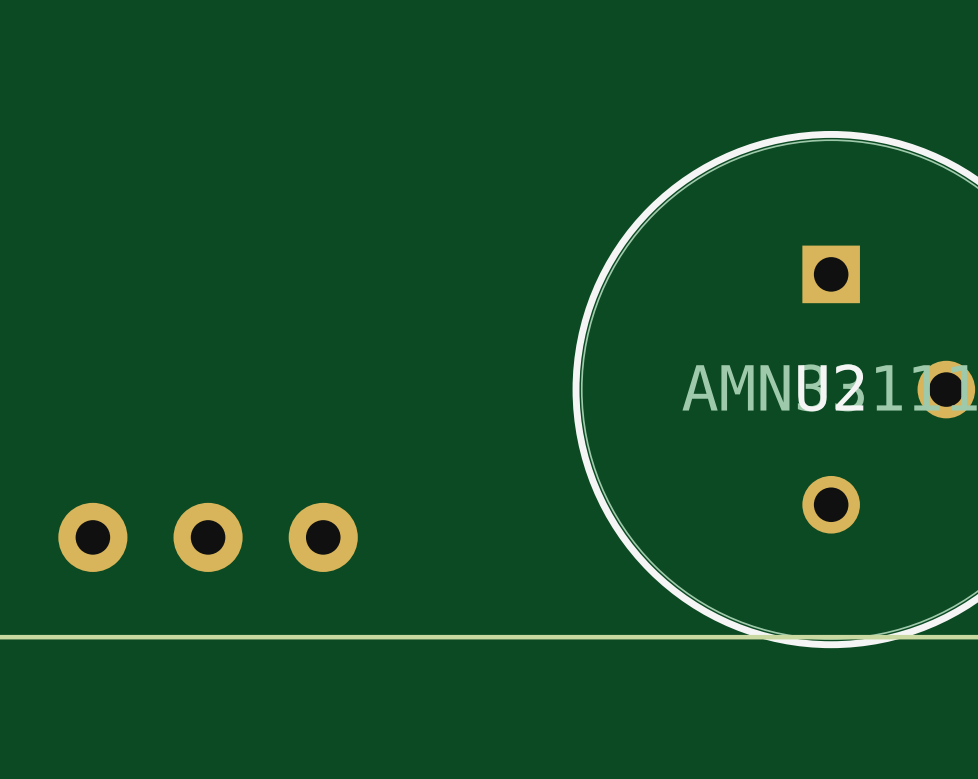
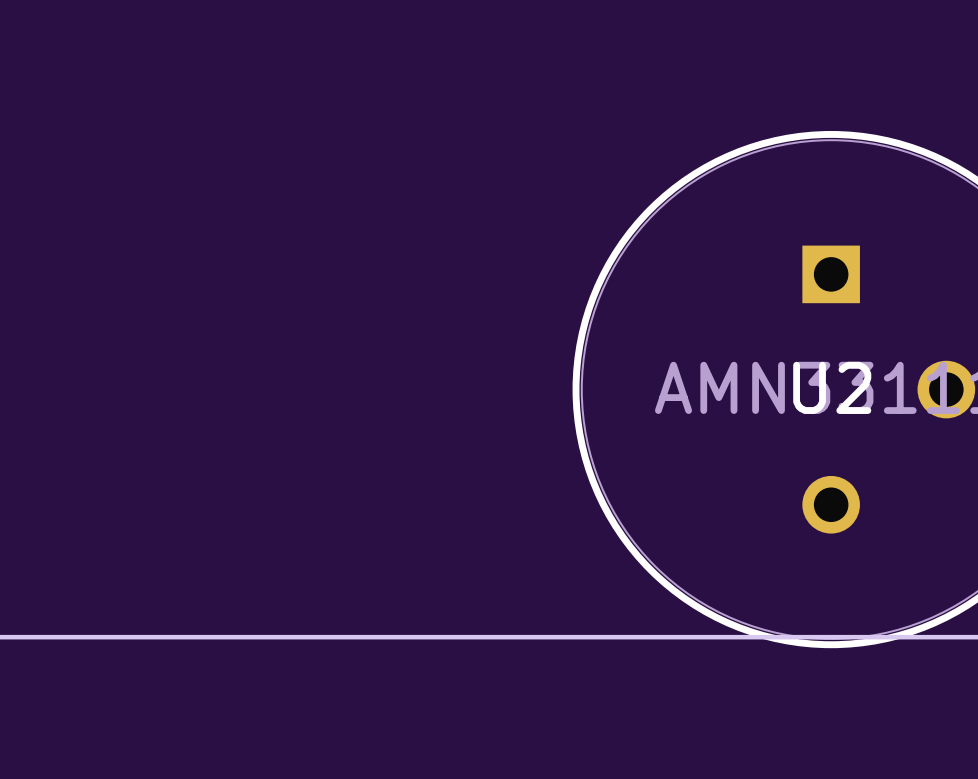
part: (208, 537) -> none

